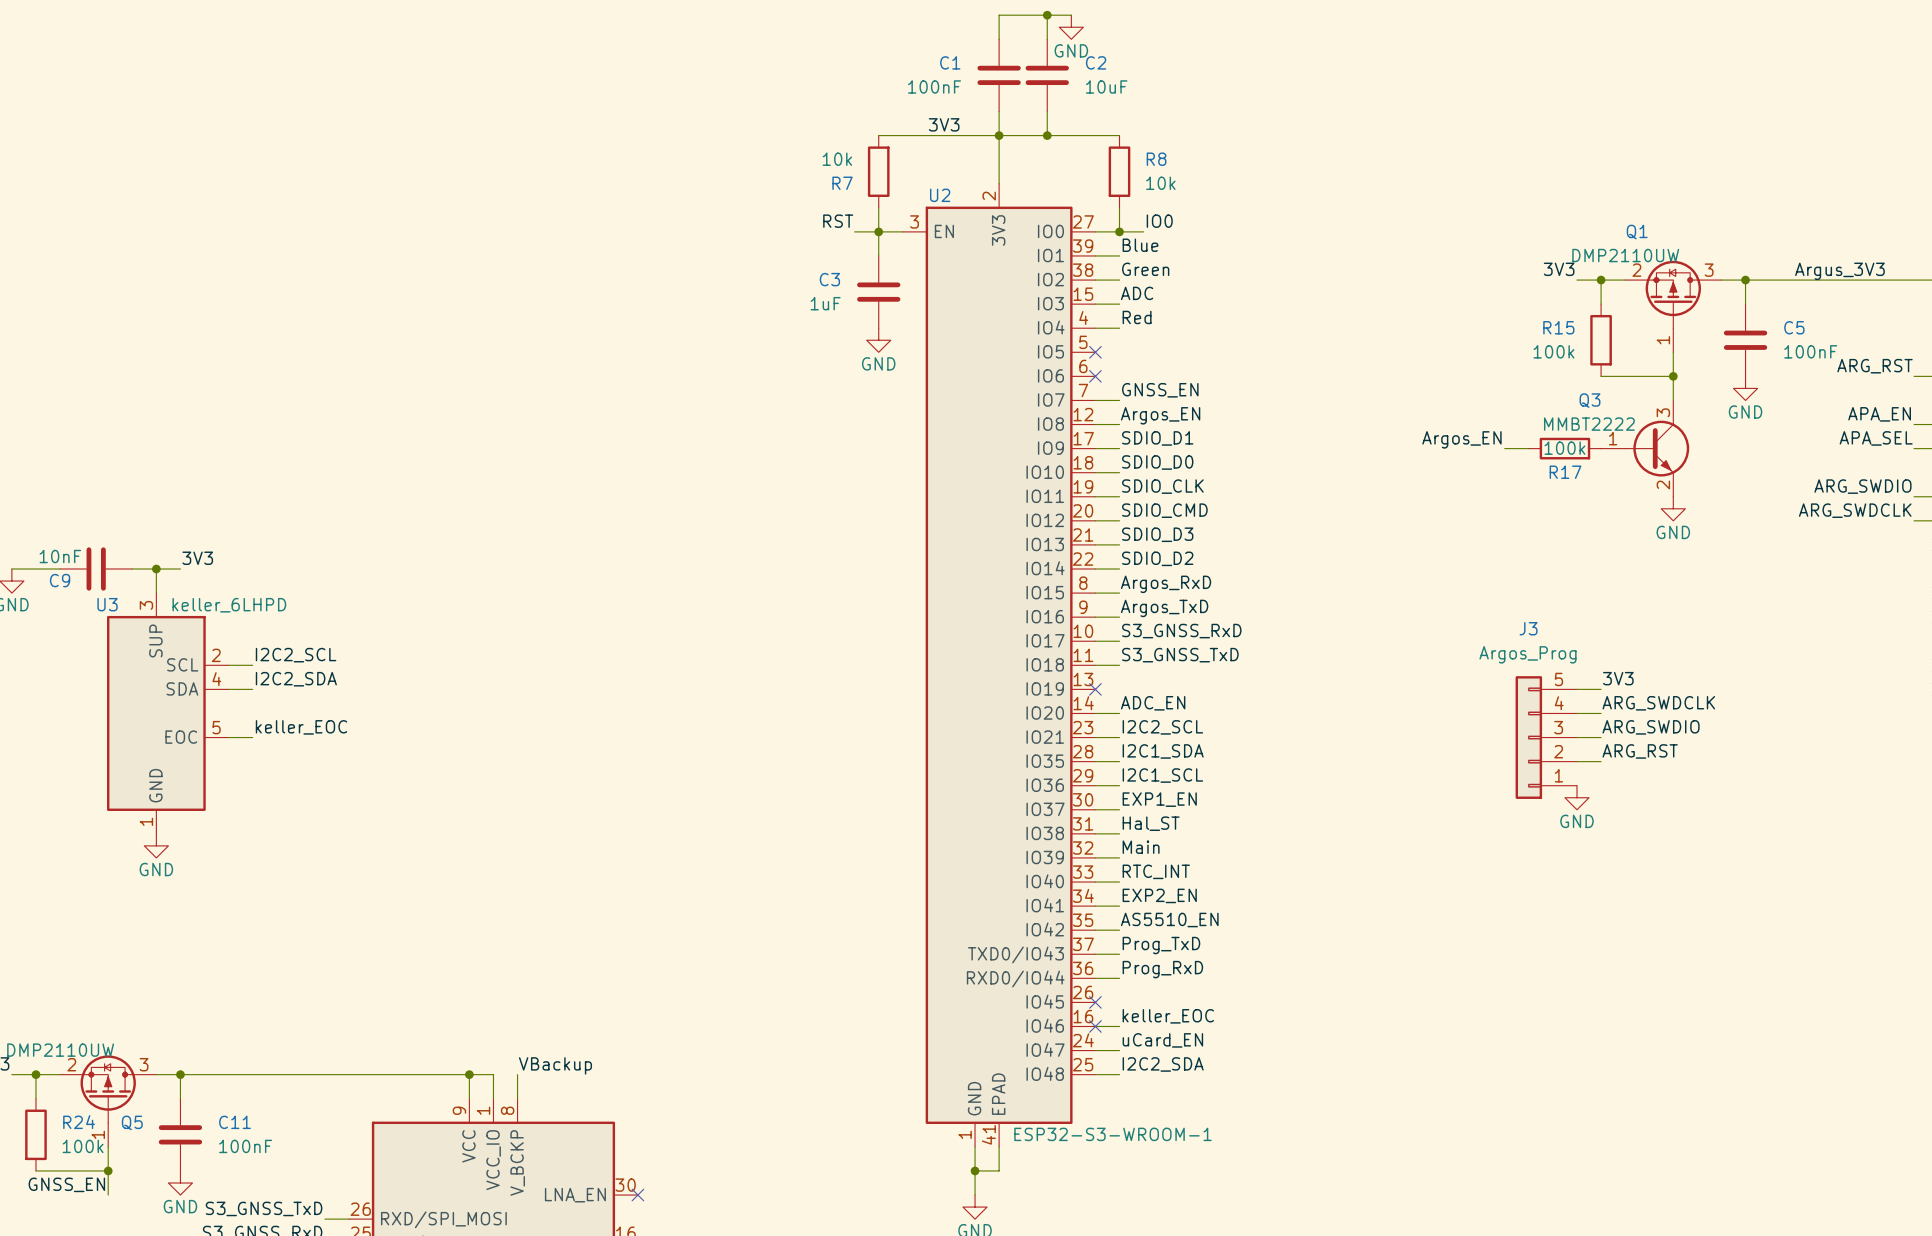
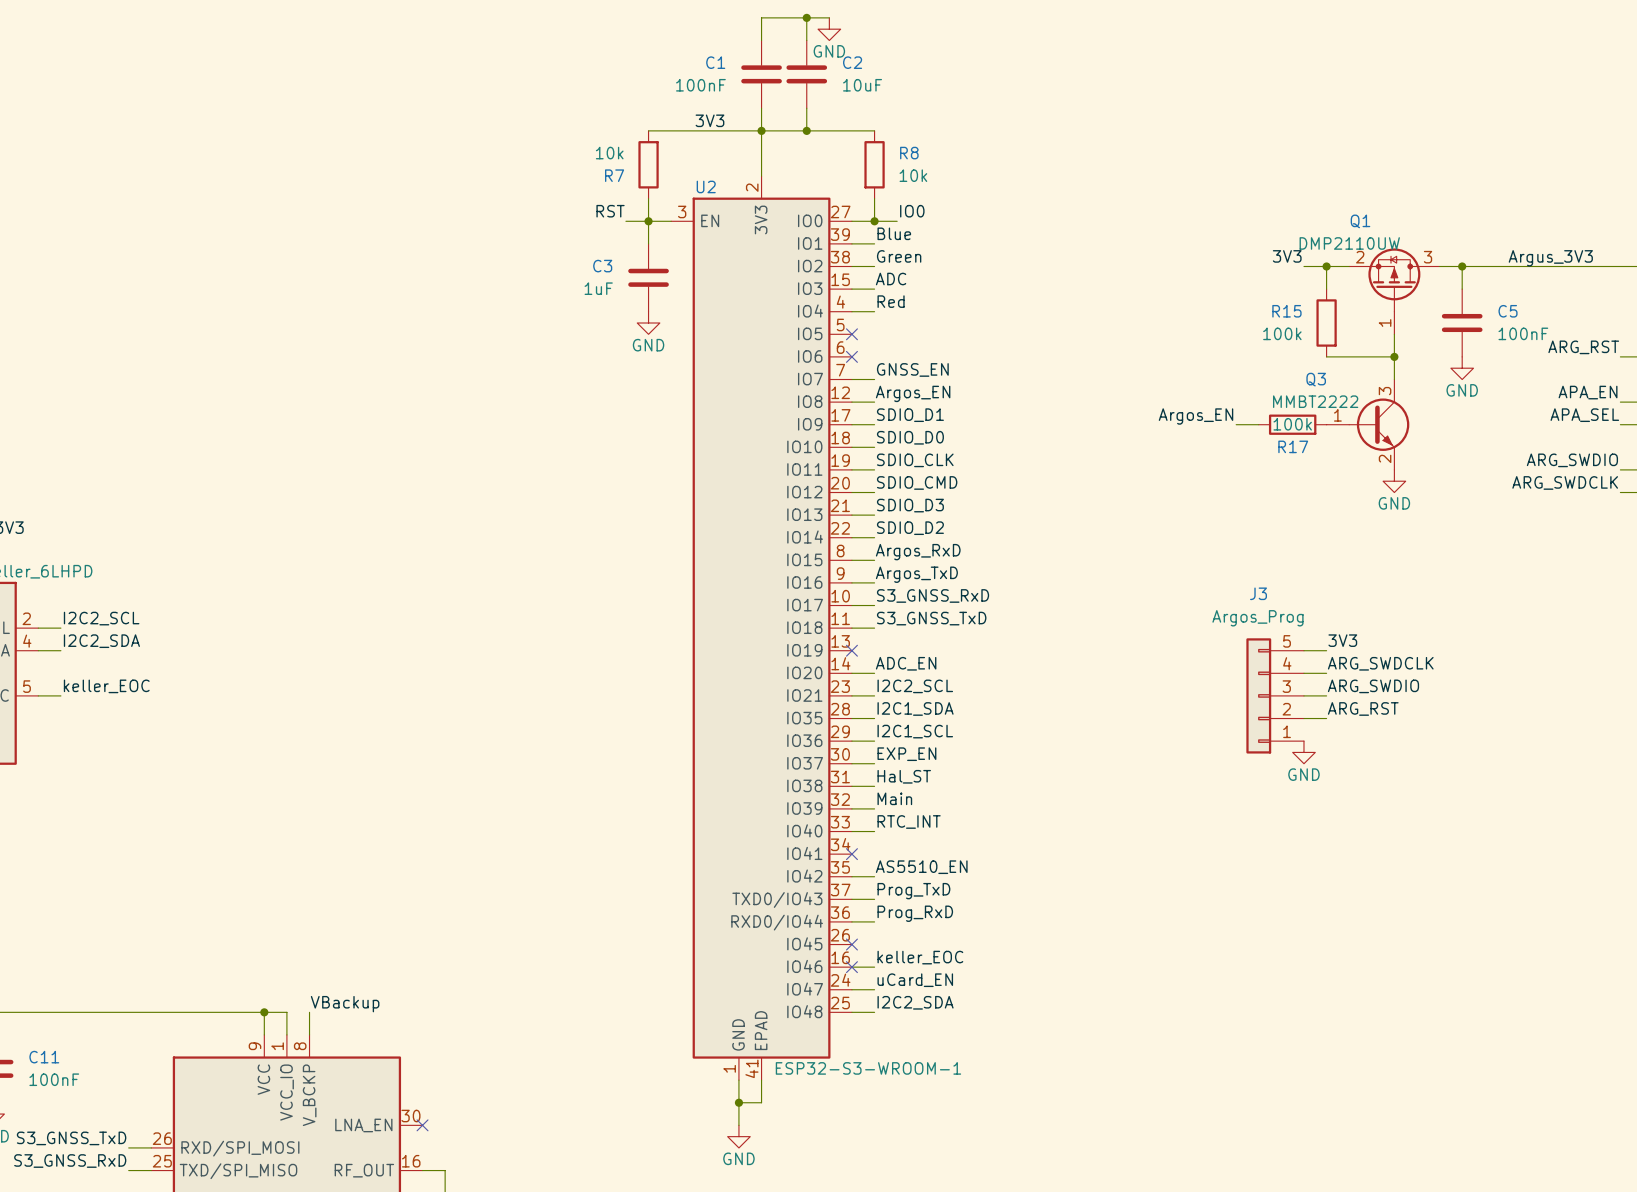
label: EXP1_EN (1159, 799) -> EXP_EN (906, 754)
label: EXP2_EN (1159, 895) -> none
wire: (1095, 906) (1119, 906) -> none
no-connect mark: none -> (851, 854)

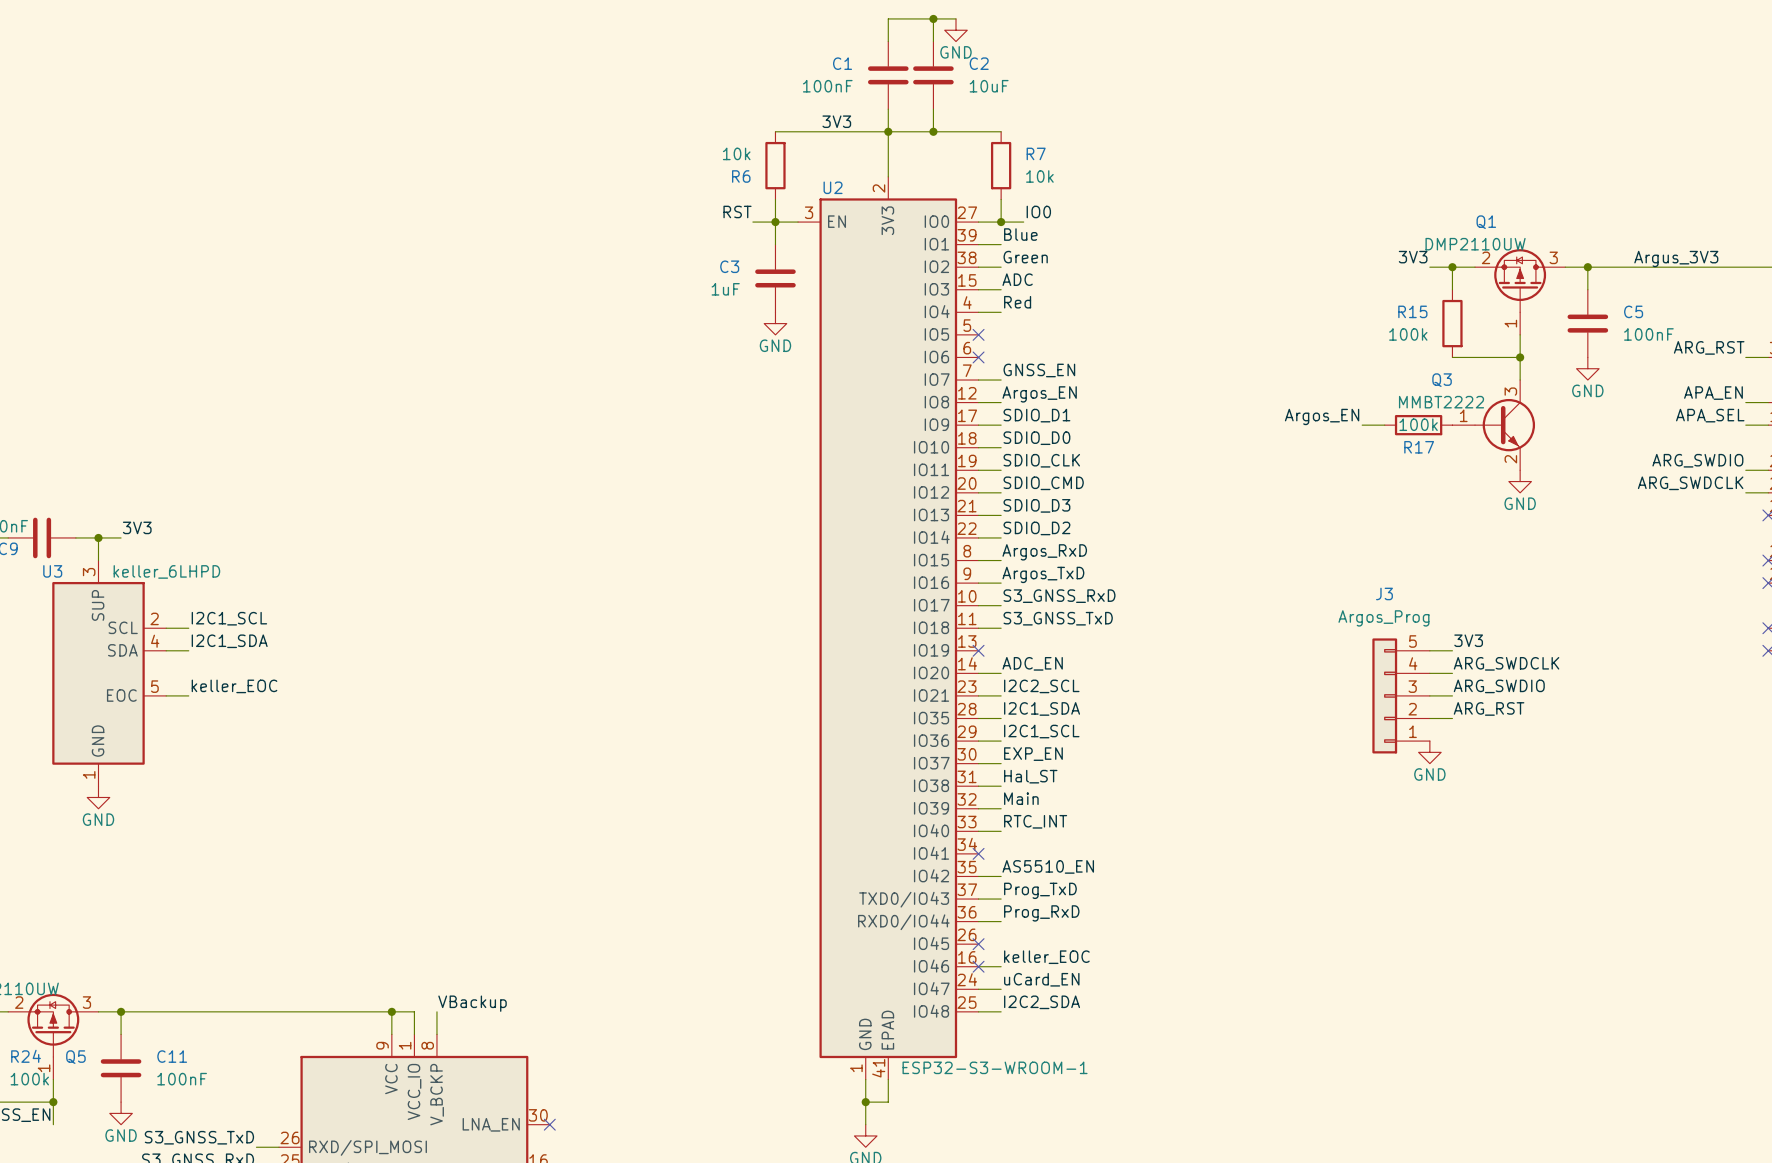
R8 name: R8 (909, 153) -> R7 (1036, 153)
R7 name: R7 (614, 175) -> R6 (741, 176)
label: I2C2_SCL (101, 618) -> I2C1_SCL (229, 618)
label: I2C2_SDA (101, 641) -> I2C1_SDA (229, 641)

